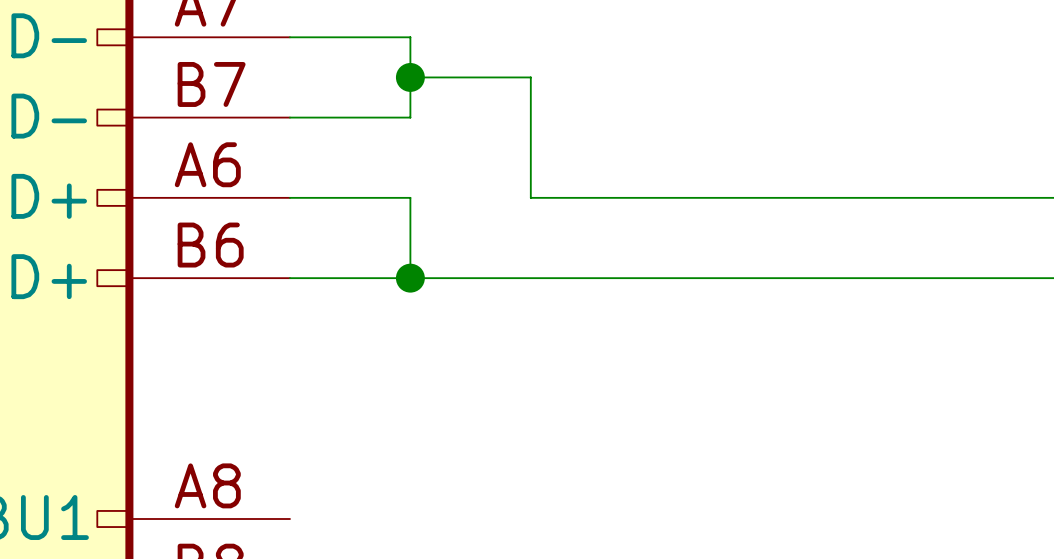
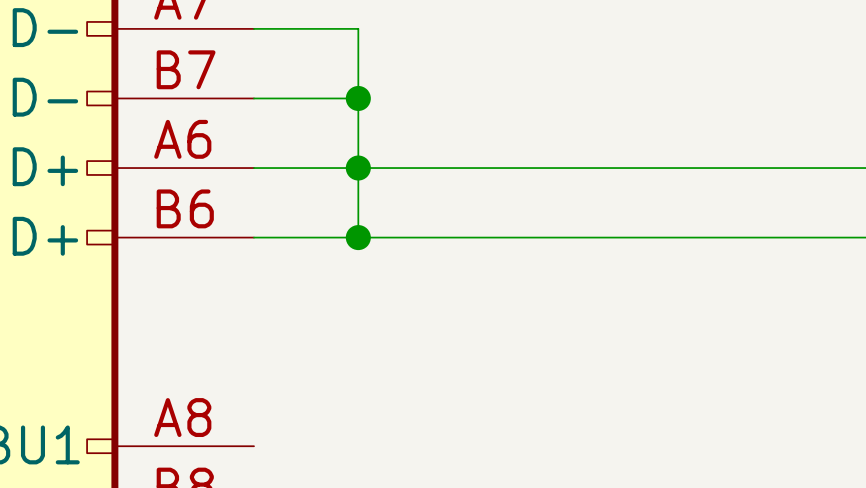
wire: (410, 77) (530, 77) (530, 197) -> (358, 98) (358, 168) (462, 168)
junction position: (410, 77) -> (358, 98)
junction: none -> (358, 168)

